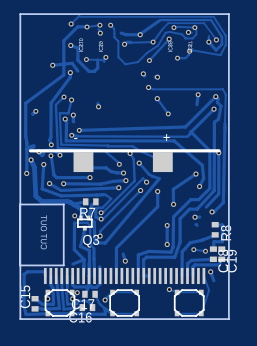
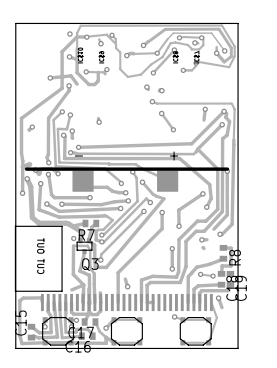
track: (71, 24) (78, 16) (213, 16) (225, 35) -> (77, 59) (77, 33) (80, 25) (221, 25) (234, 46)
track: (99, 25) (86, 26) -> (116, 44) (107, 34) (86, 36)
via: (99, 25) -> none
track: (121, 33) (140, 34) (160, 20) (211, 20) (221, 36) (221, 44) (216, 50) -> (148, 40) (143, 45) (165, 29) (219, 29) (231, 47) (231, 56) (224, 61)

